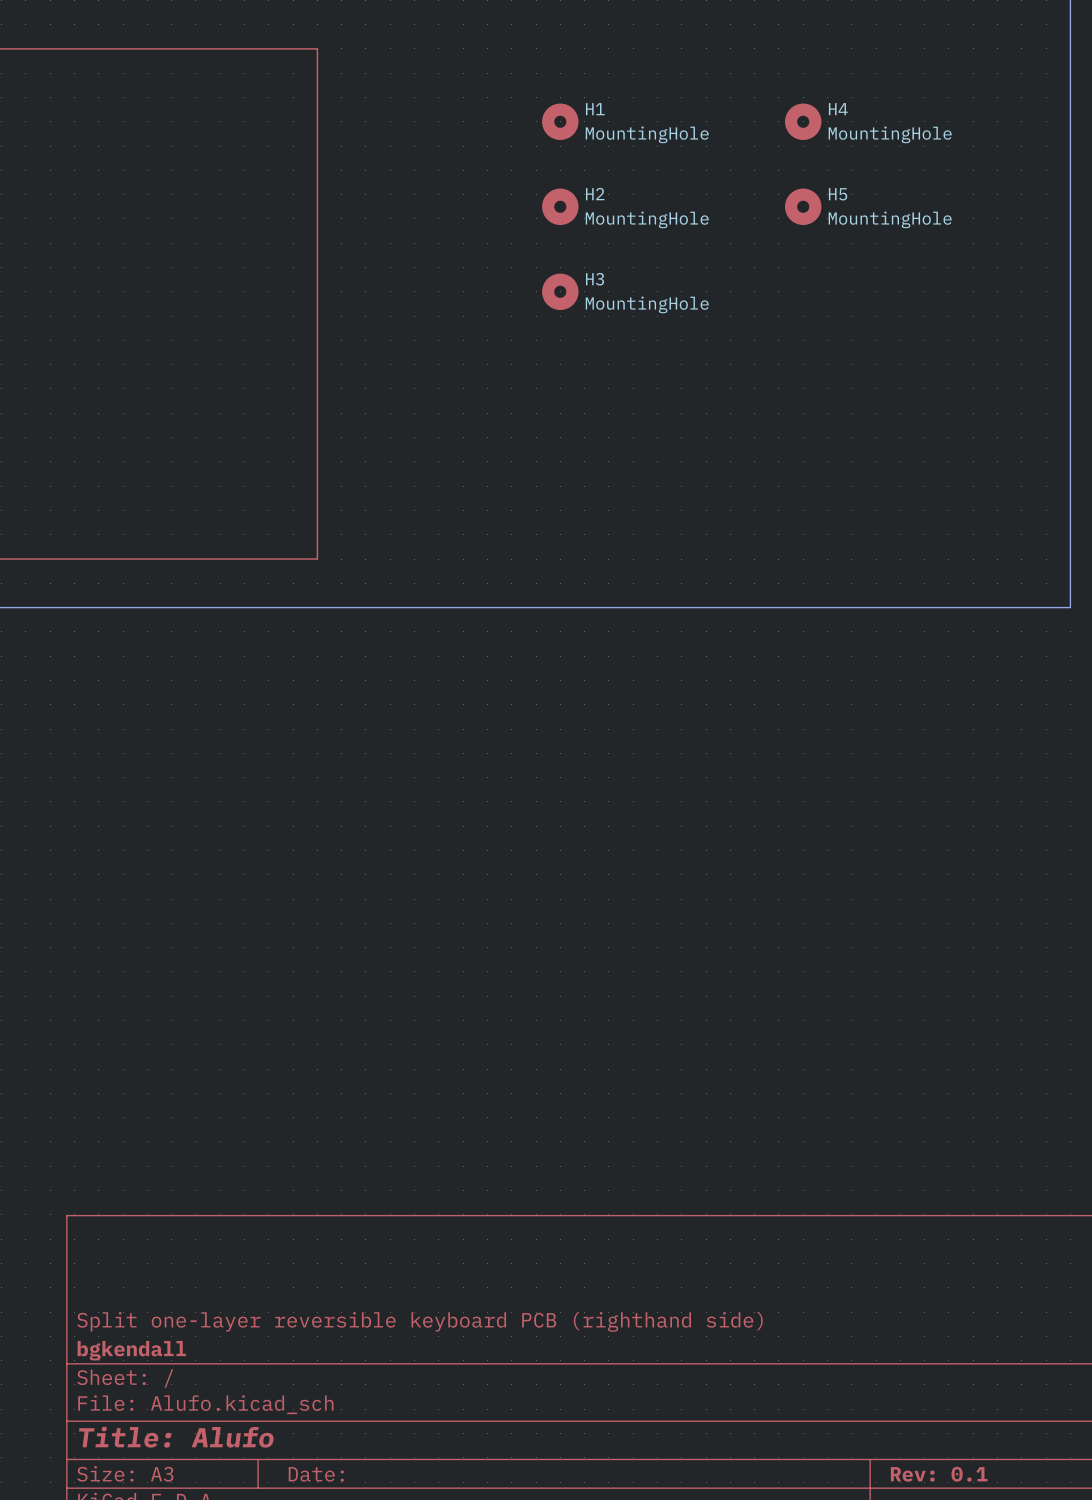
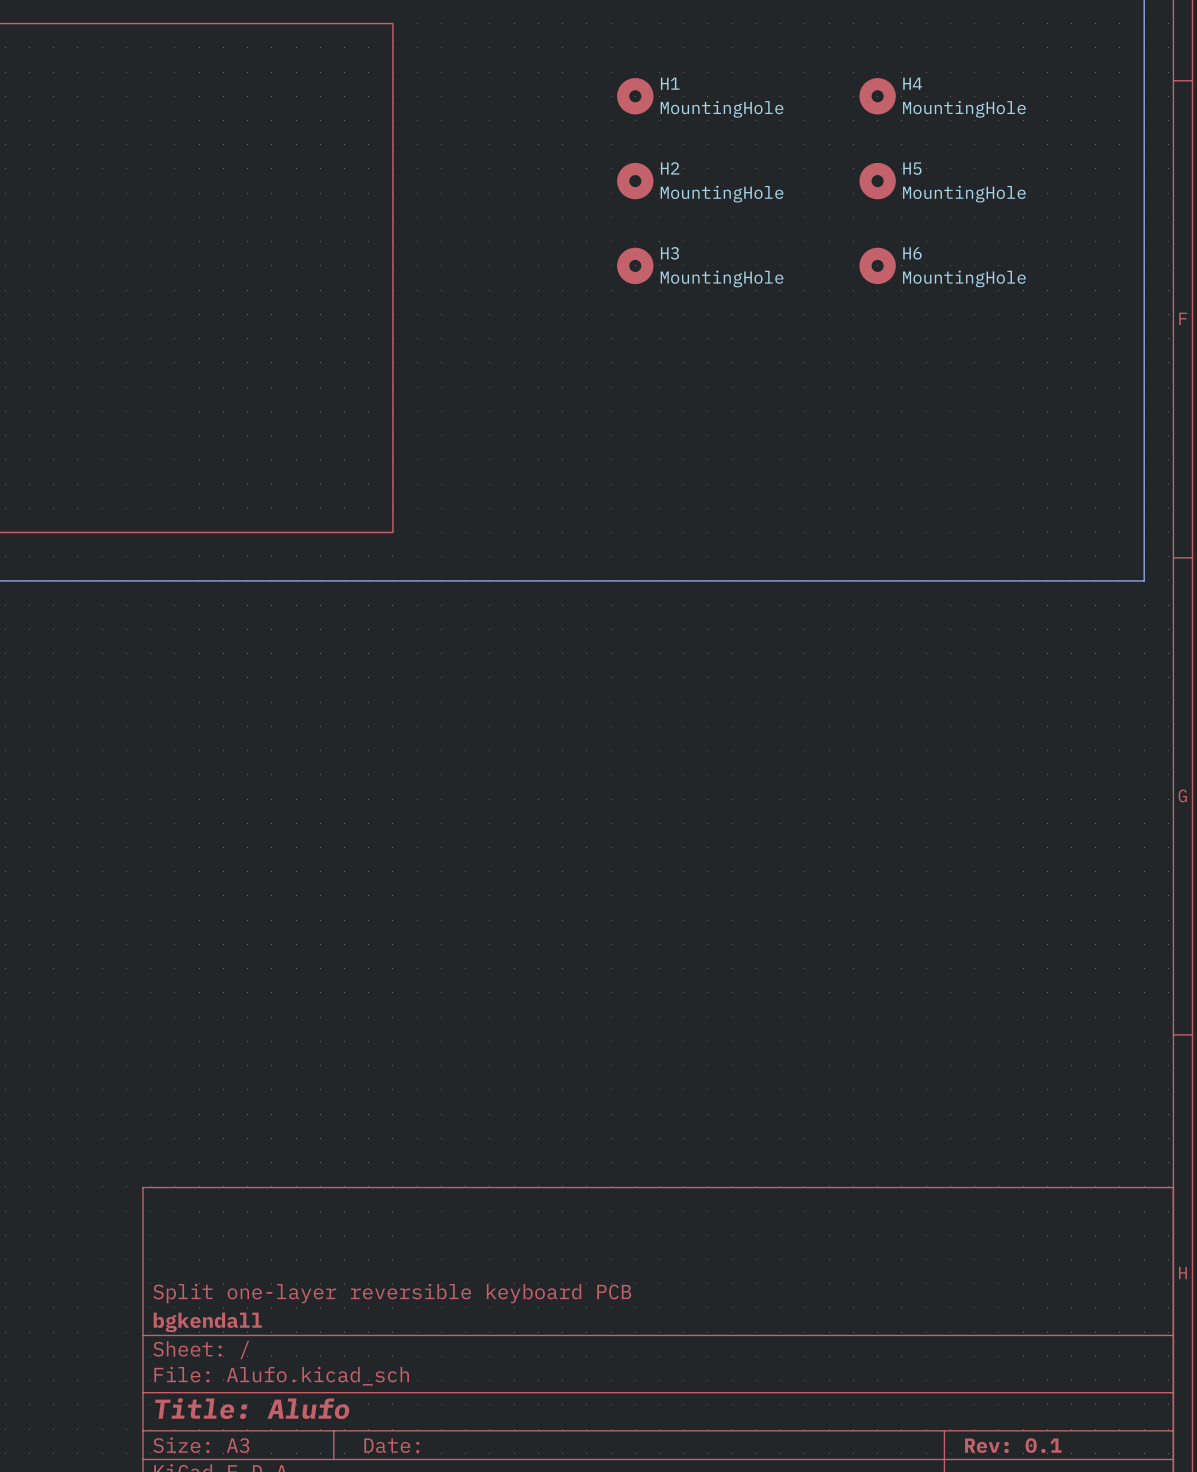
H6: none -> MountingHole (877, 265)
title block: Split one-layer reversible keyboard PCB (righthand side) (420, 1321) -> Split one-layer reversible keyboard PCB (392, 1293)

